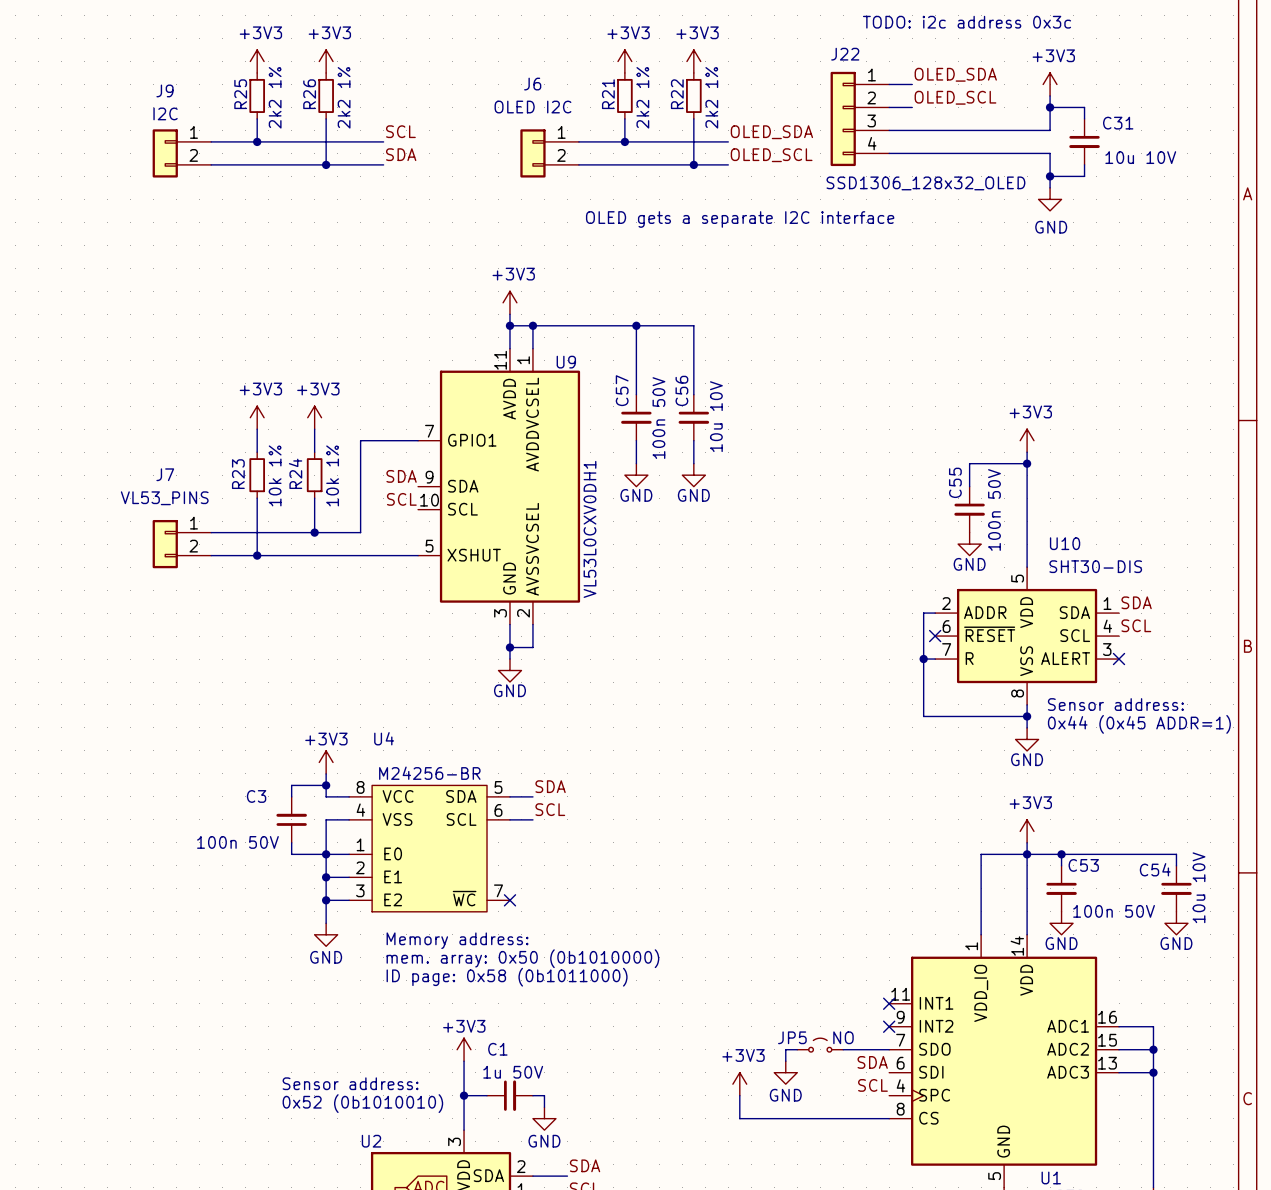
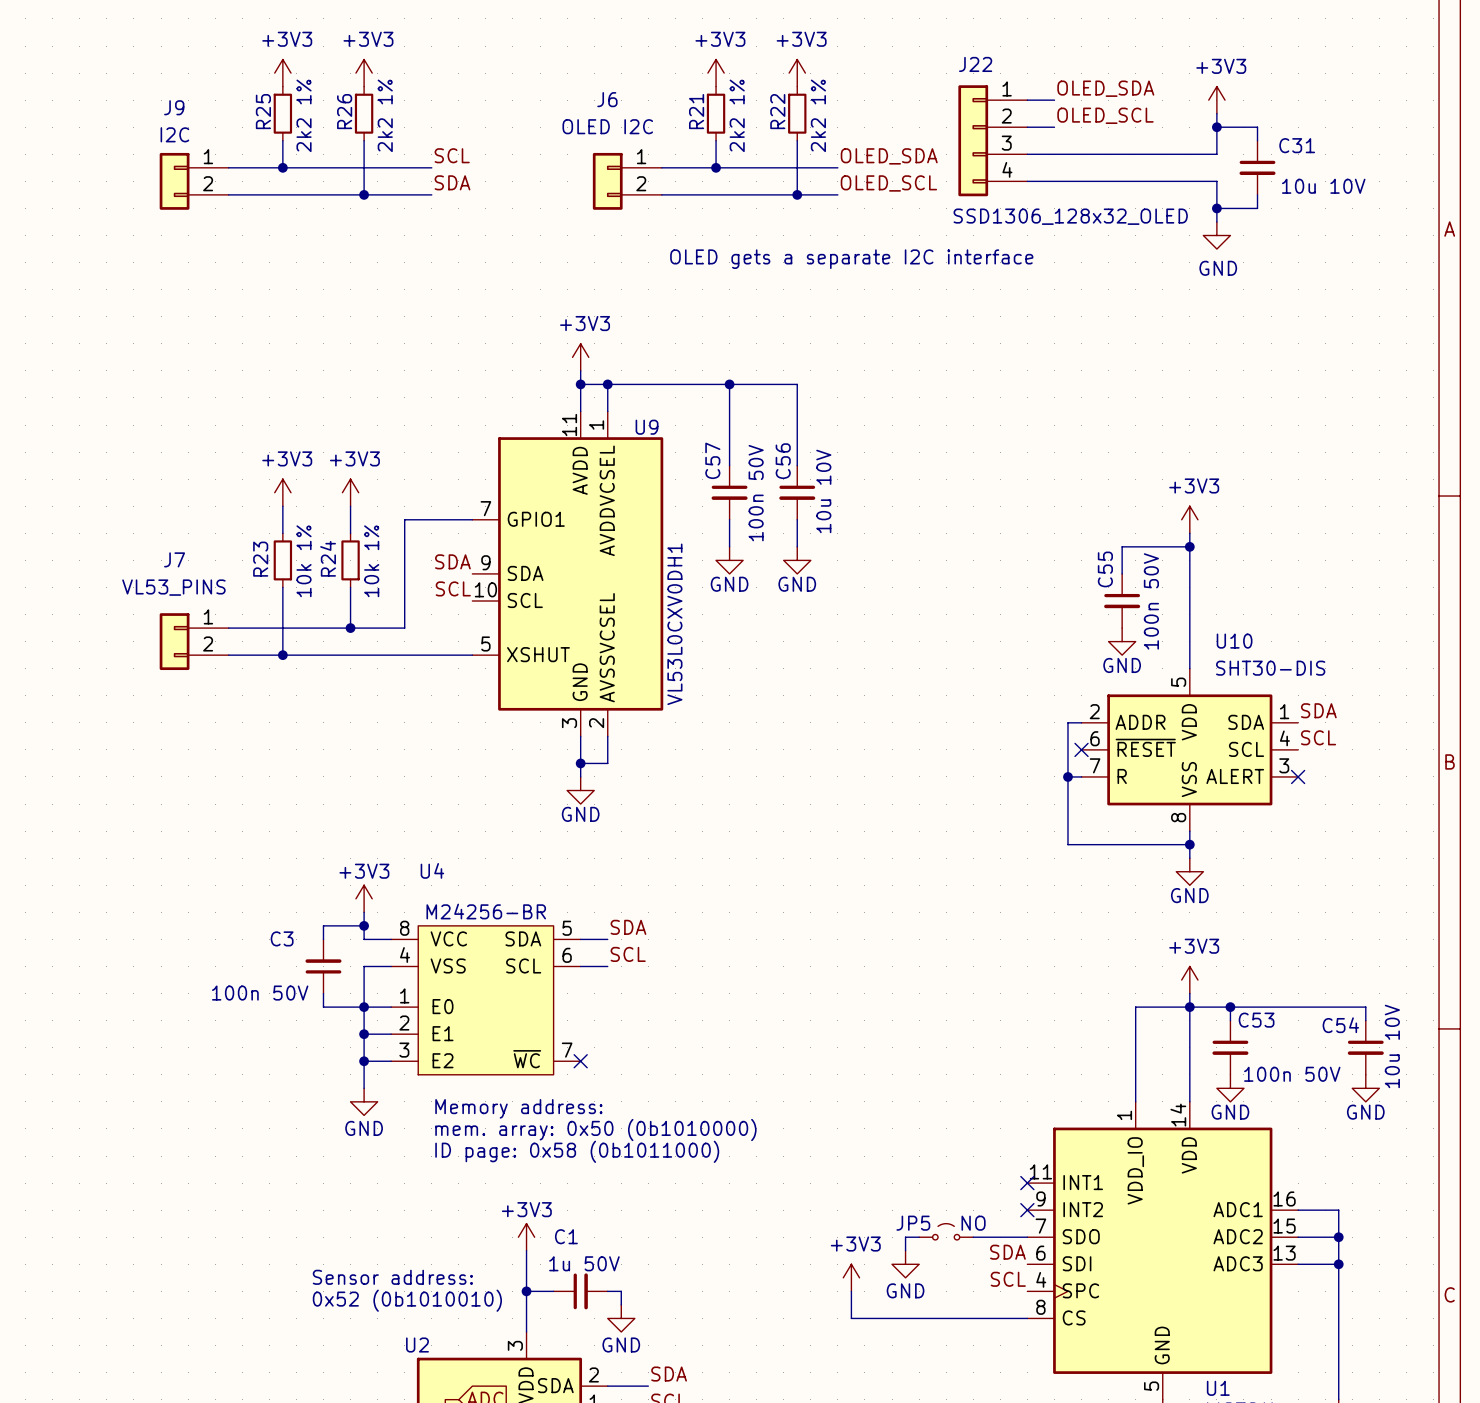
text: TODO: i2c address 0x3c (967, 22) -> none
text: Sensor address: (1115, 704) -> none
text: 0x44 (0x45 ADDR=1) (1139, 724) -> none

